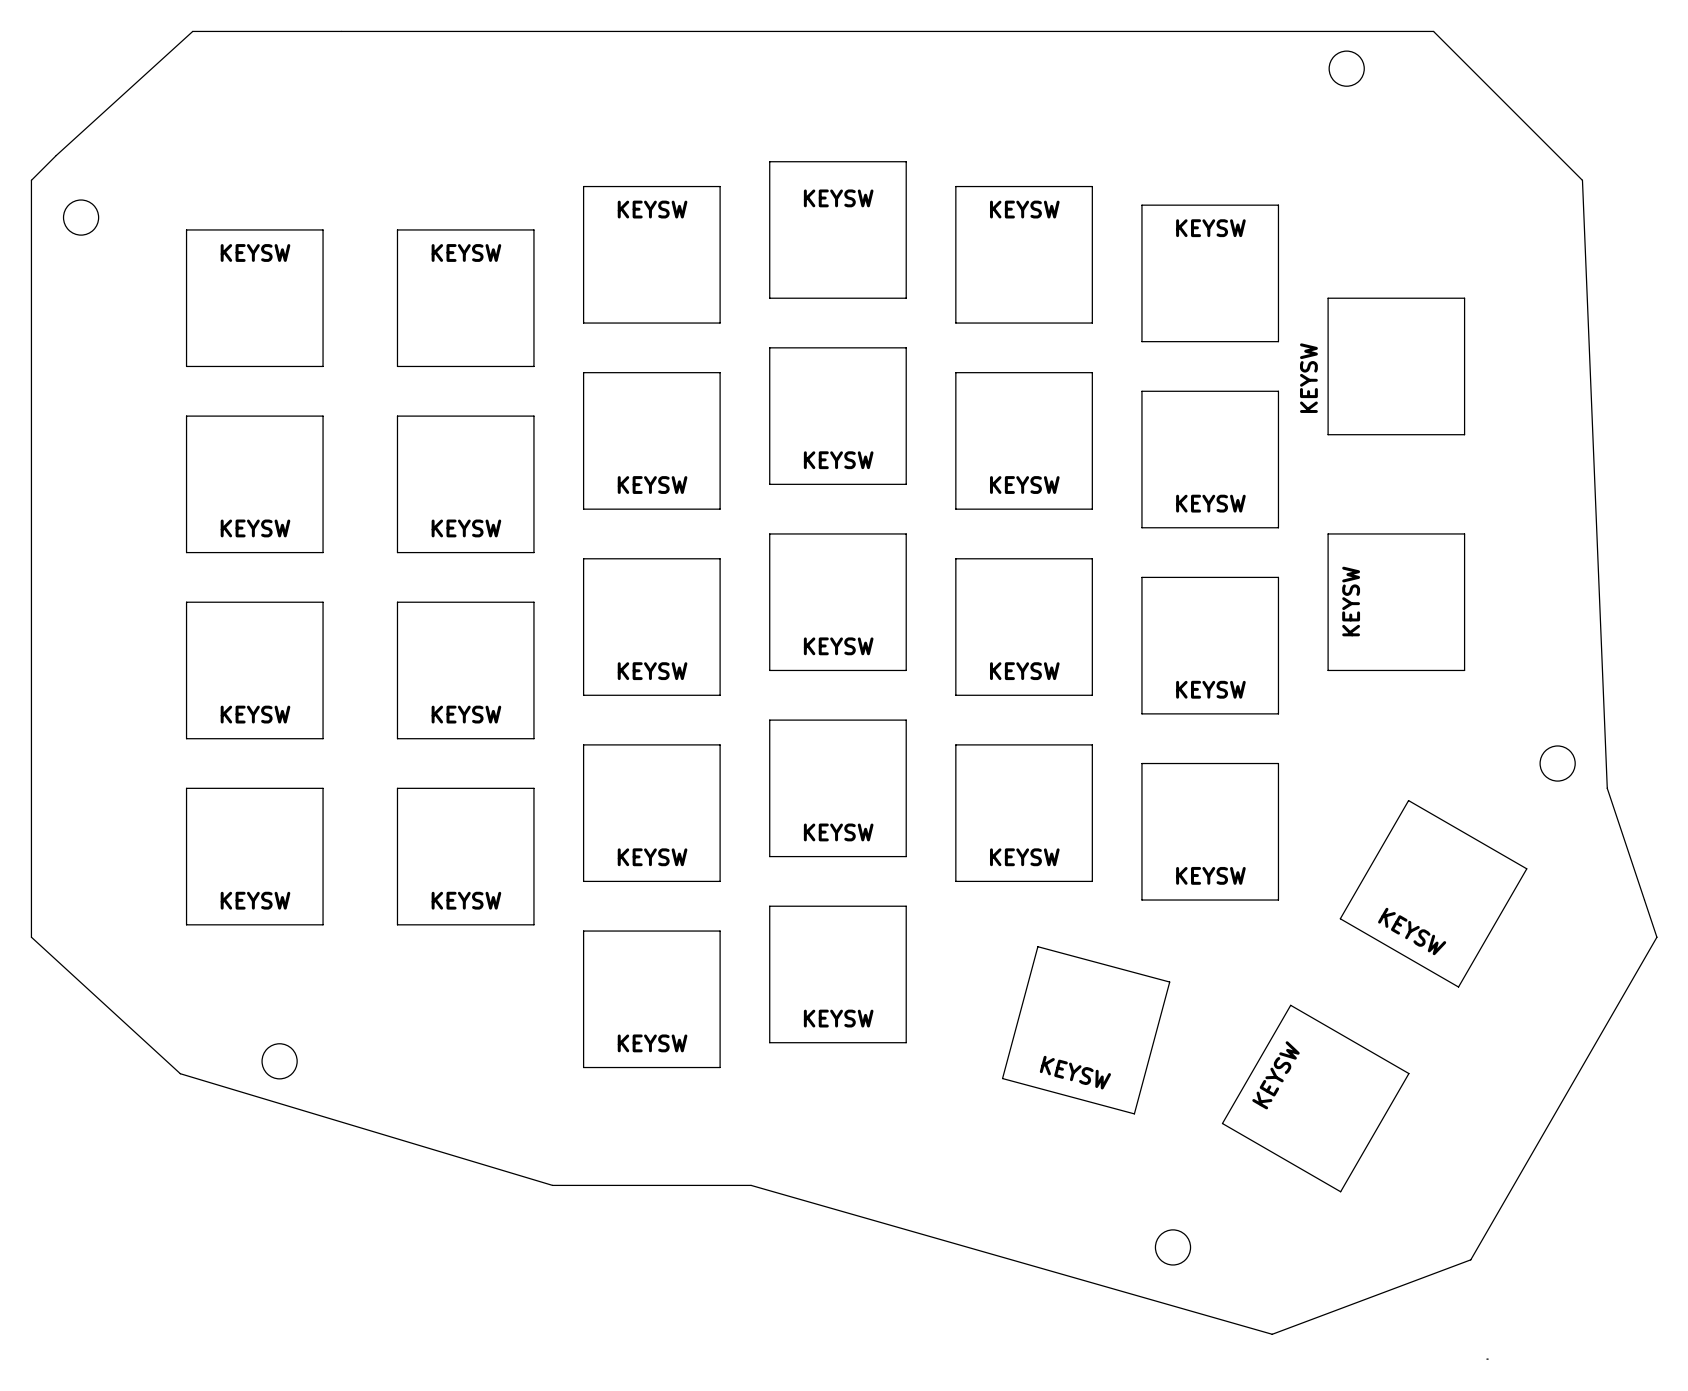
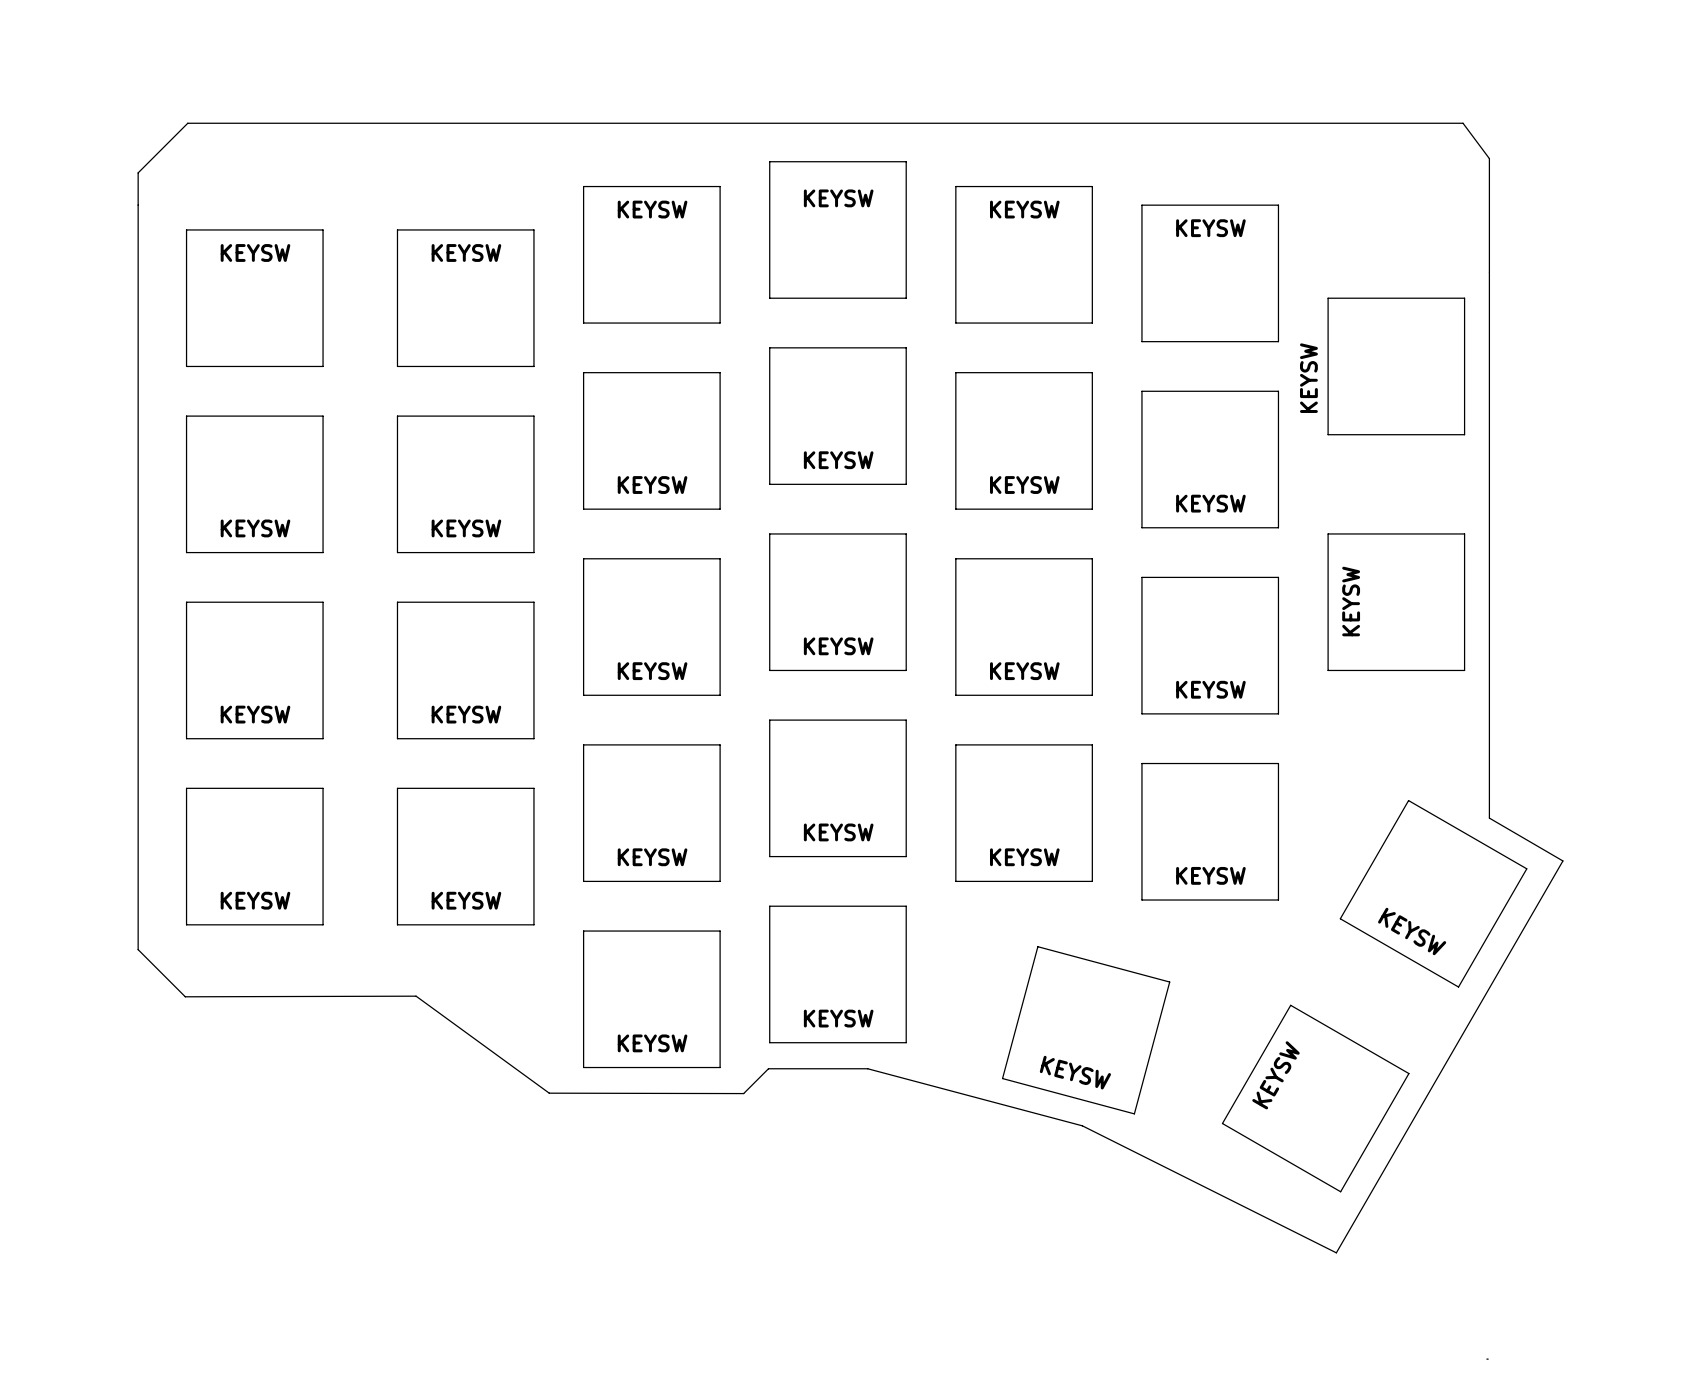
board edge: (192, 31) (31, 180) (31, 937) (180, 1073) (552, 1185) (751, 1185) (1272, 1334) (1470, 1259) (1656, 937) (1607, 788) (1582, 180) (1433, 31) (192, 31) -> (187, 123) (138, 172) (138, 949) (185, 996) (416, 996) (549, 1093) (743, 1093) (768, 1068) (867, 1068) (1082, 1125) (1336, 1252) (1562, 860) (1489, 818) (1489, 158) (1463, 123) (187, 123)
round board edge: [1328, 50, 1365, 87] -> none
round board edge: [63, 199, 100, 236] -> none
round board edge: [1539, 745, 1576, 782] -> none
round board edge: [261, 1043, 298, 1080] -> none
round board edge: [1154, 1229, 1192, 1266] -> none

